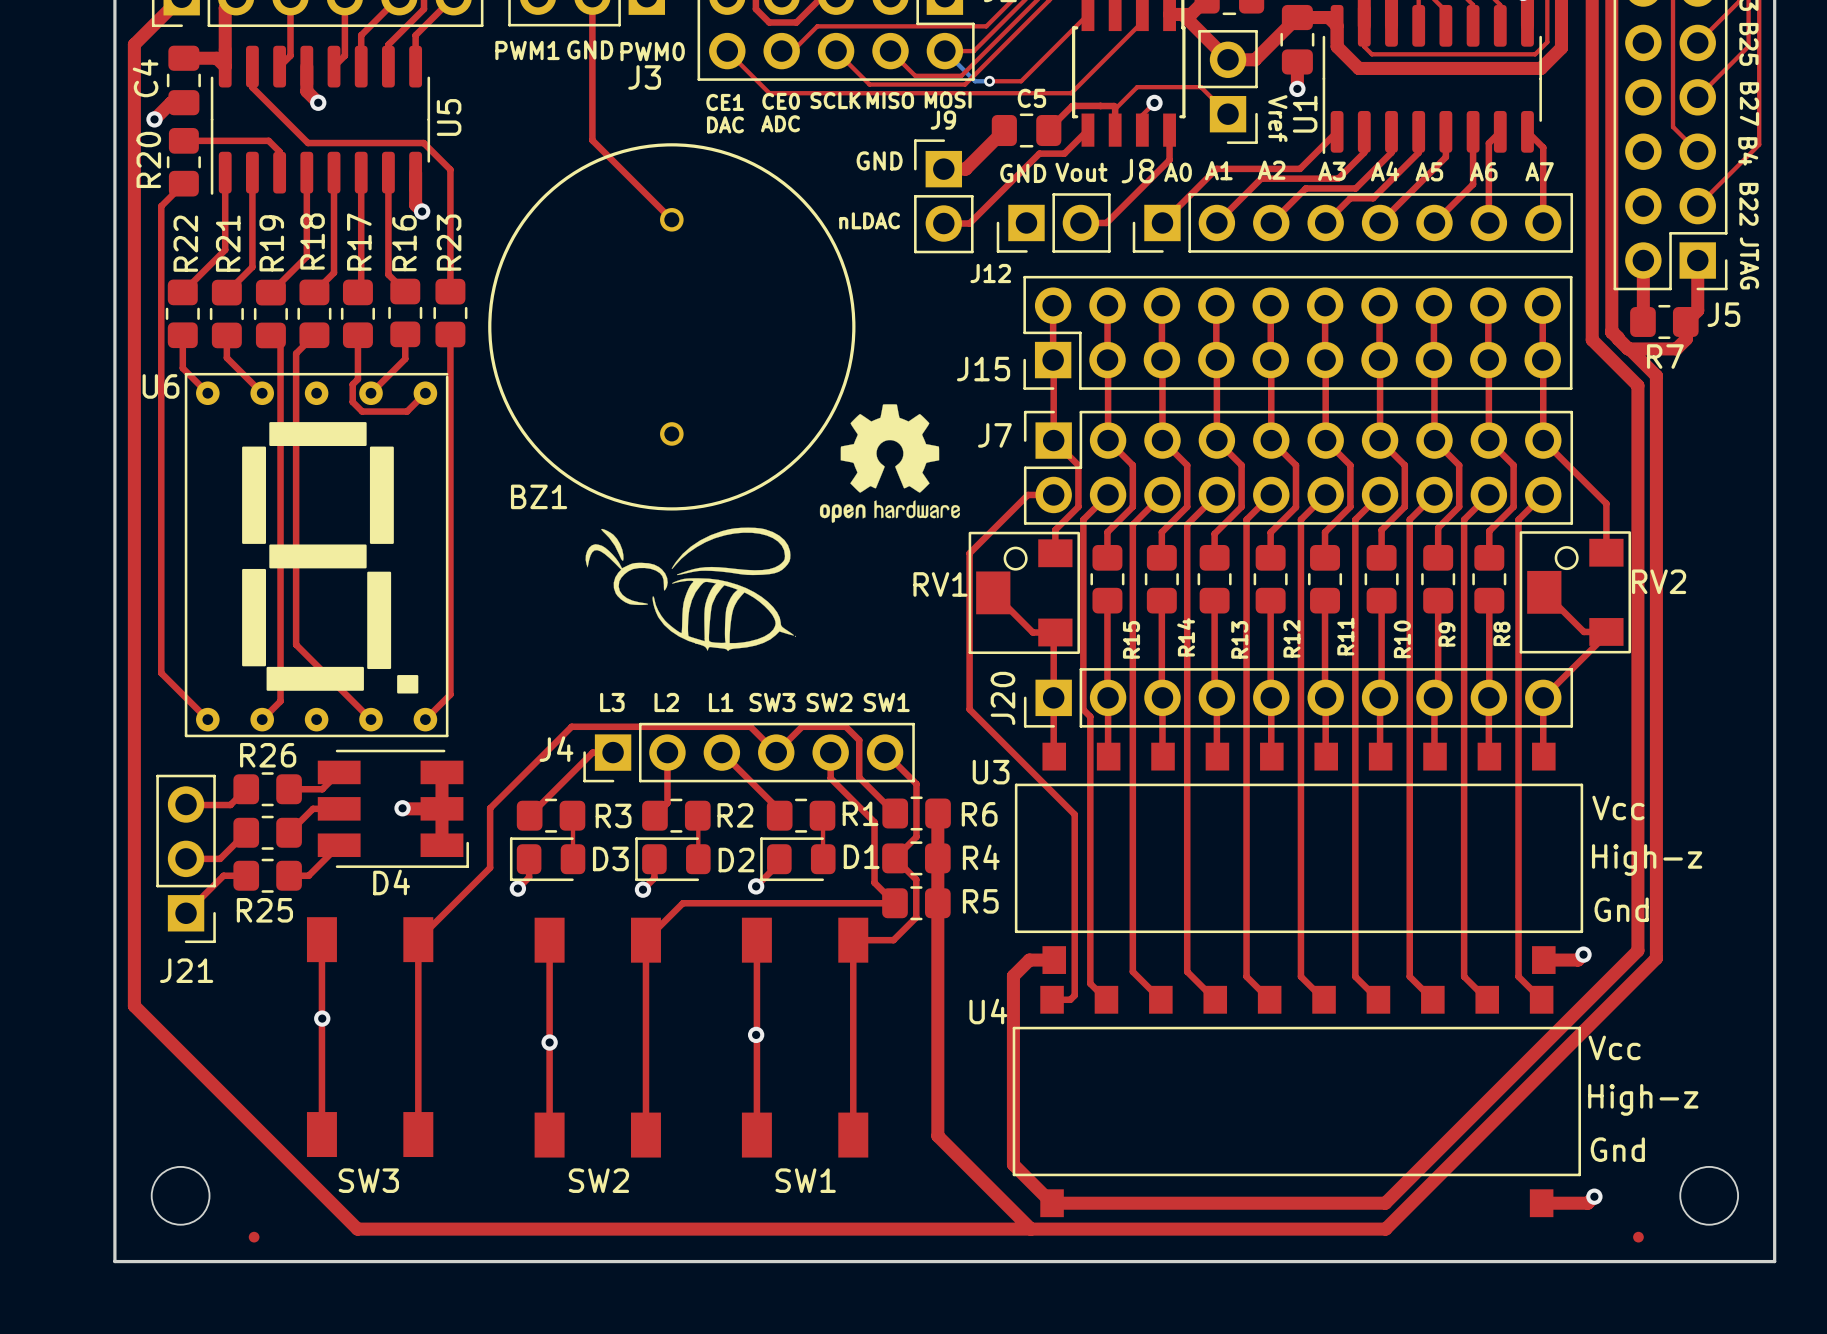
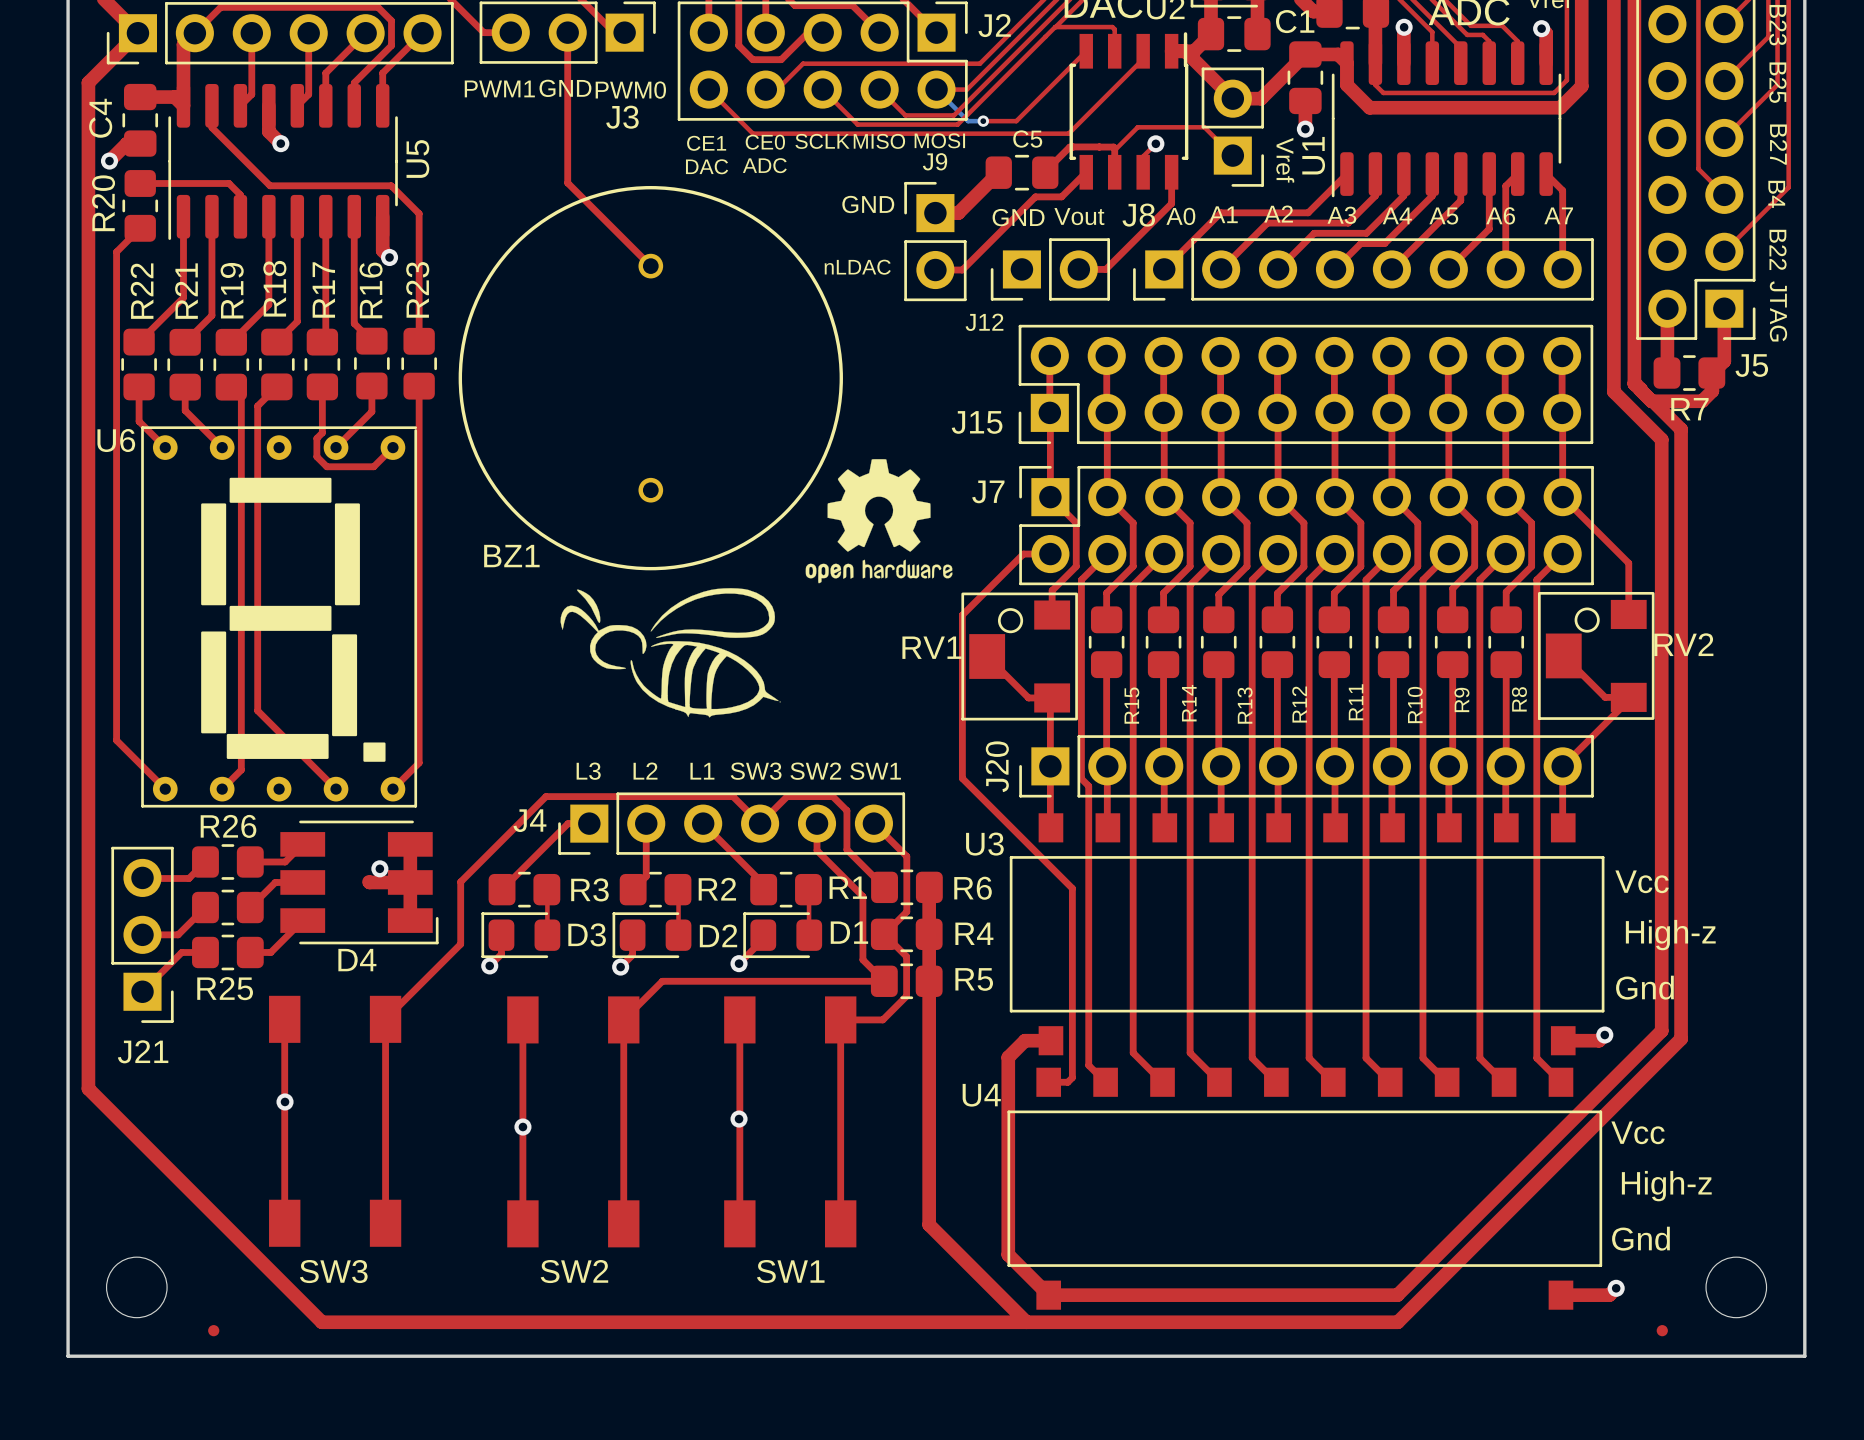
via position: (402, 808) -> (379, 868)

